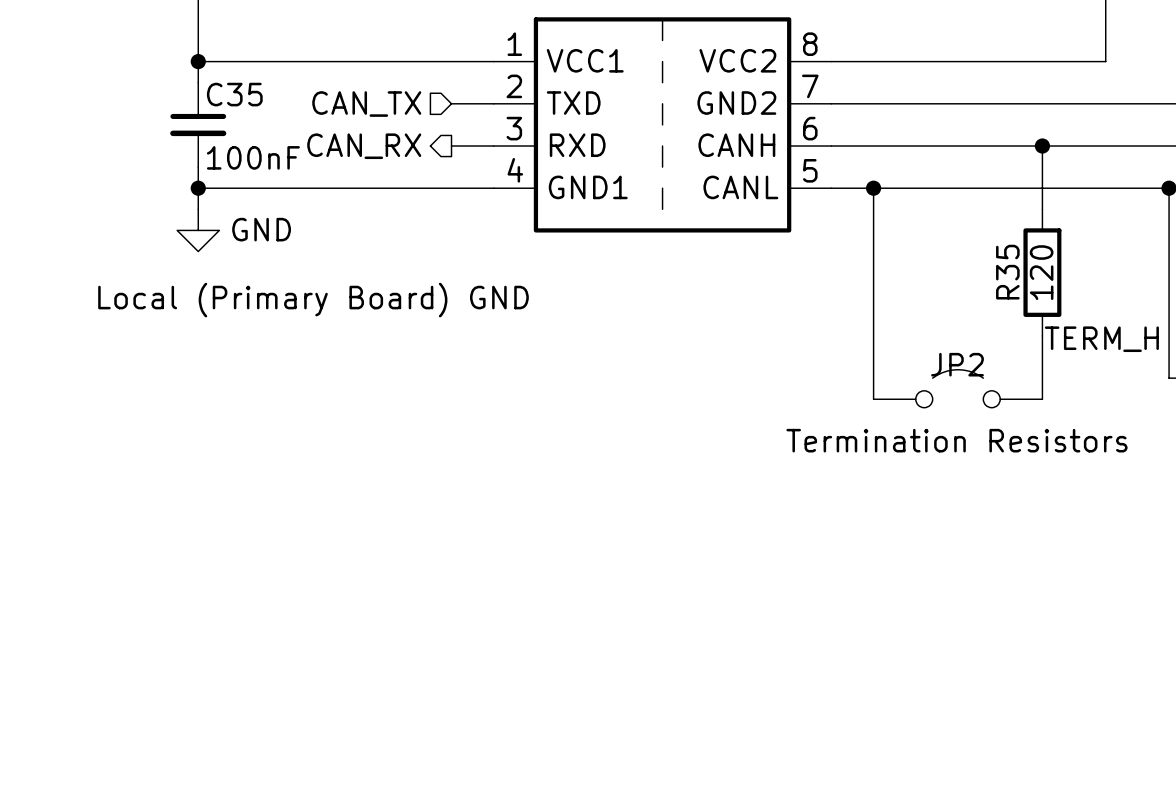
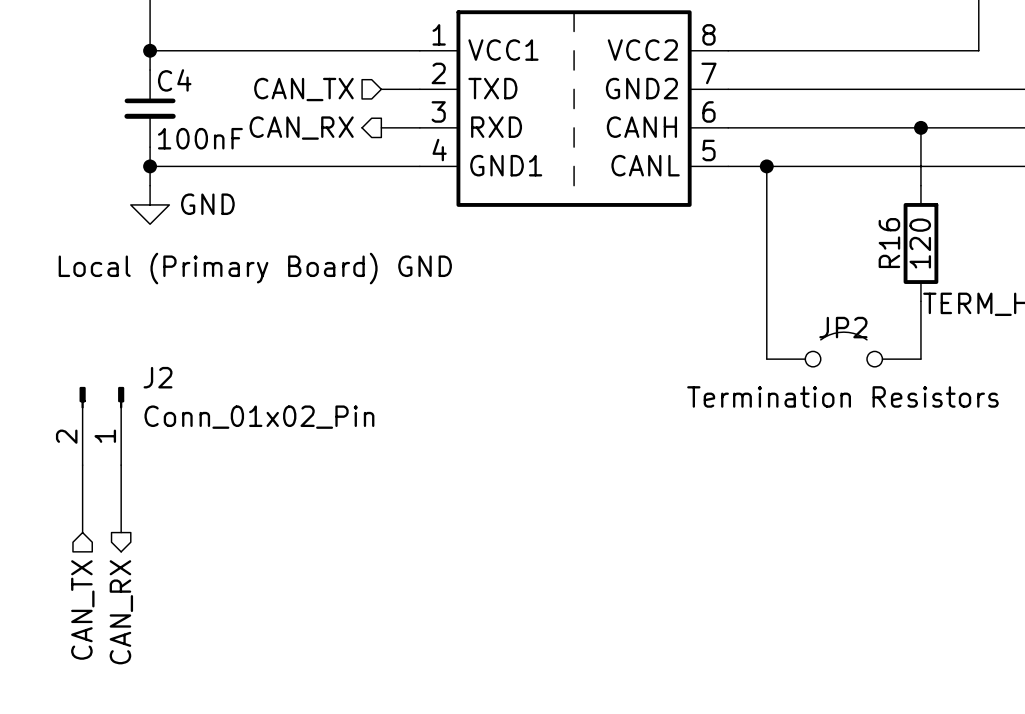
C35 name: C35 (234, 94) -> C4 (174, 80)
R35 name: R35 (1007, 272) -> R16 (889, 243)
J2: none -> Conn_01x02_Pin (101, 426)
wire: none -> (82, 465) (82, 532)
wire: none -> (121, 465) (121, 532)
hierarchical label: none -> CAN_TX (82, 609)
hierarchical label: none -> CAN_RX (121, 612)

